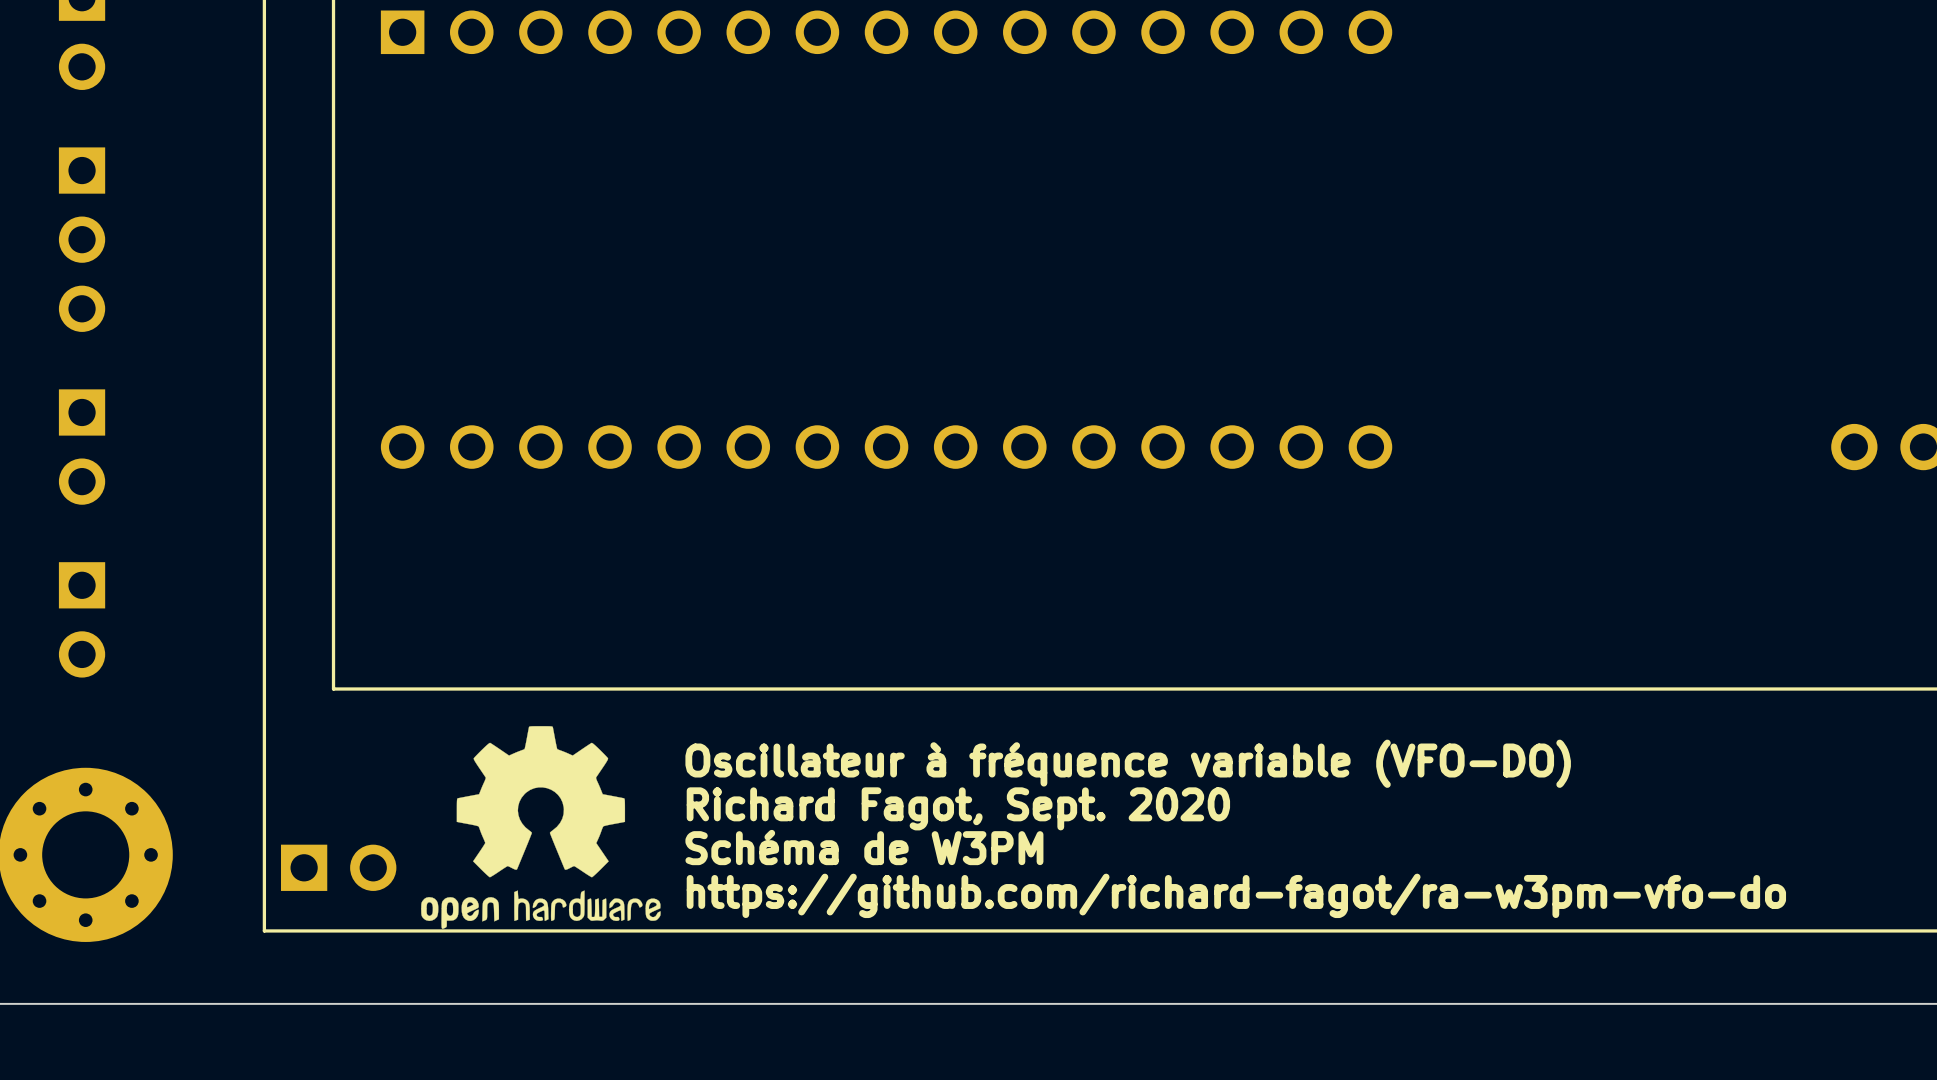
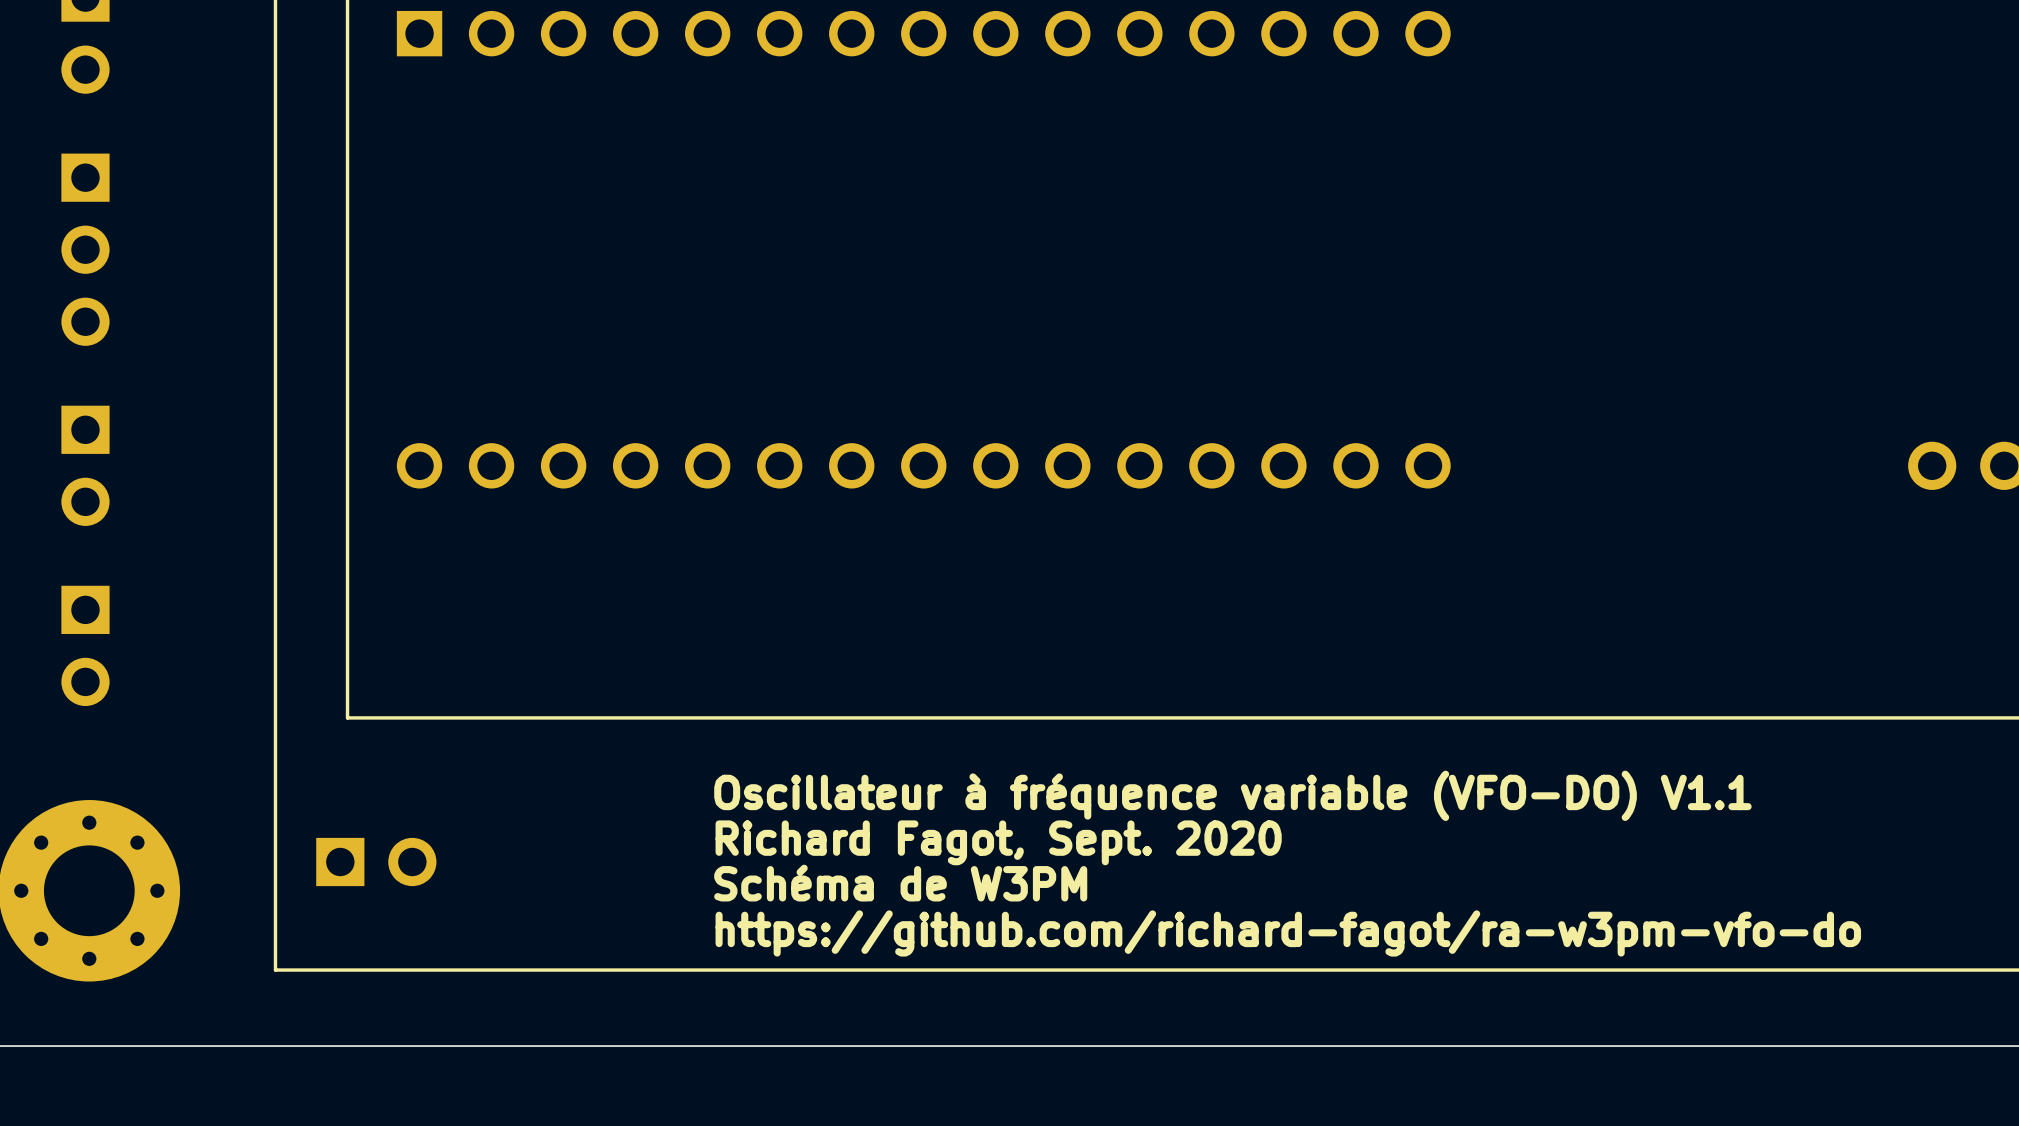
drawing: [421, 726, 661, 929] -> none
text: Oscillateur à fréquence variable (VFO-DO) (1128, 763) -> Oscillateur à fréquence variable (VFO-DO) V1.1 (1232, 795)
part position: (338, 867) -> (376, 861)

